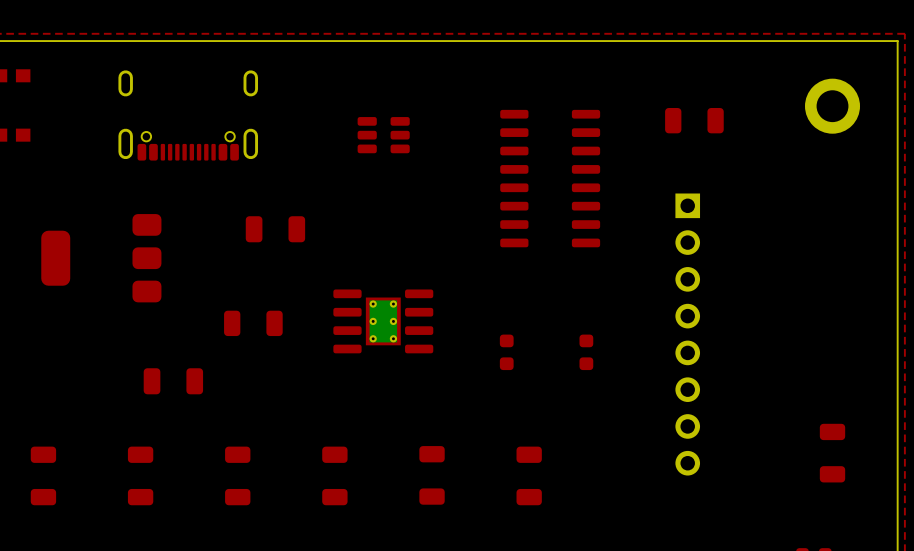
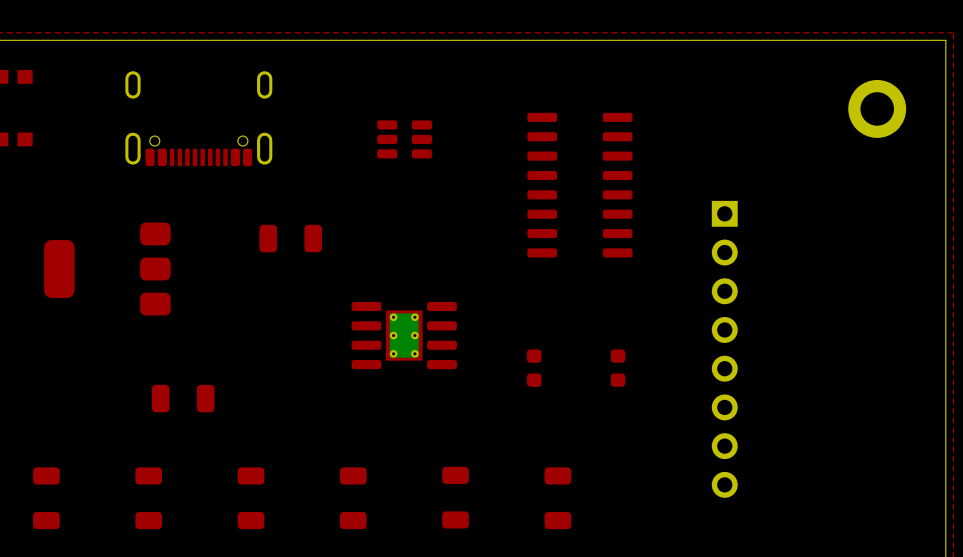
part: (694, 120) -> none
part: (253, 323) -> none
part: (832, 453) -> none

